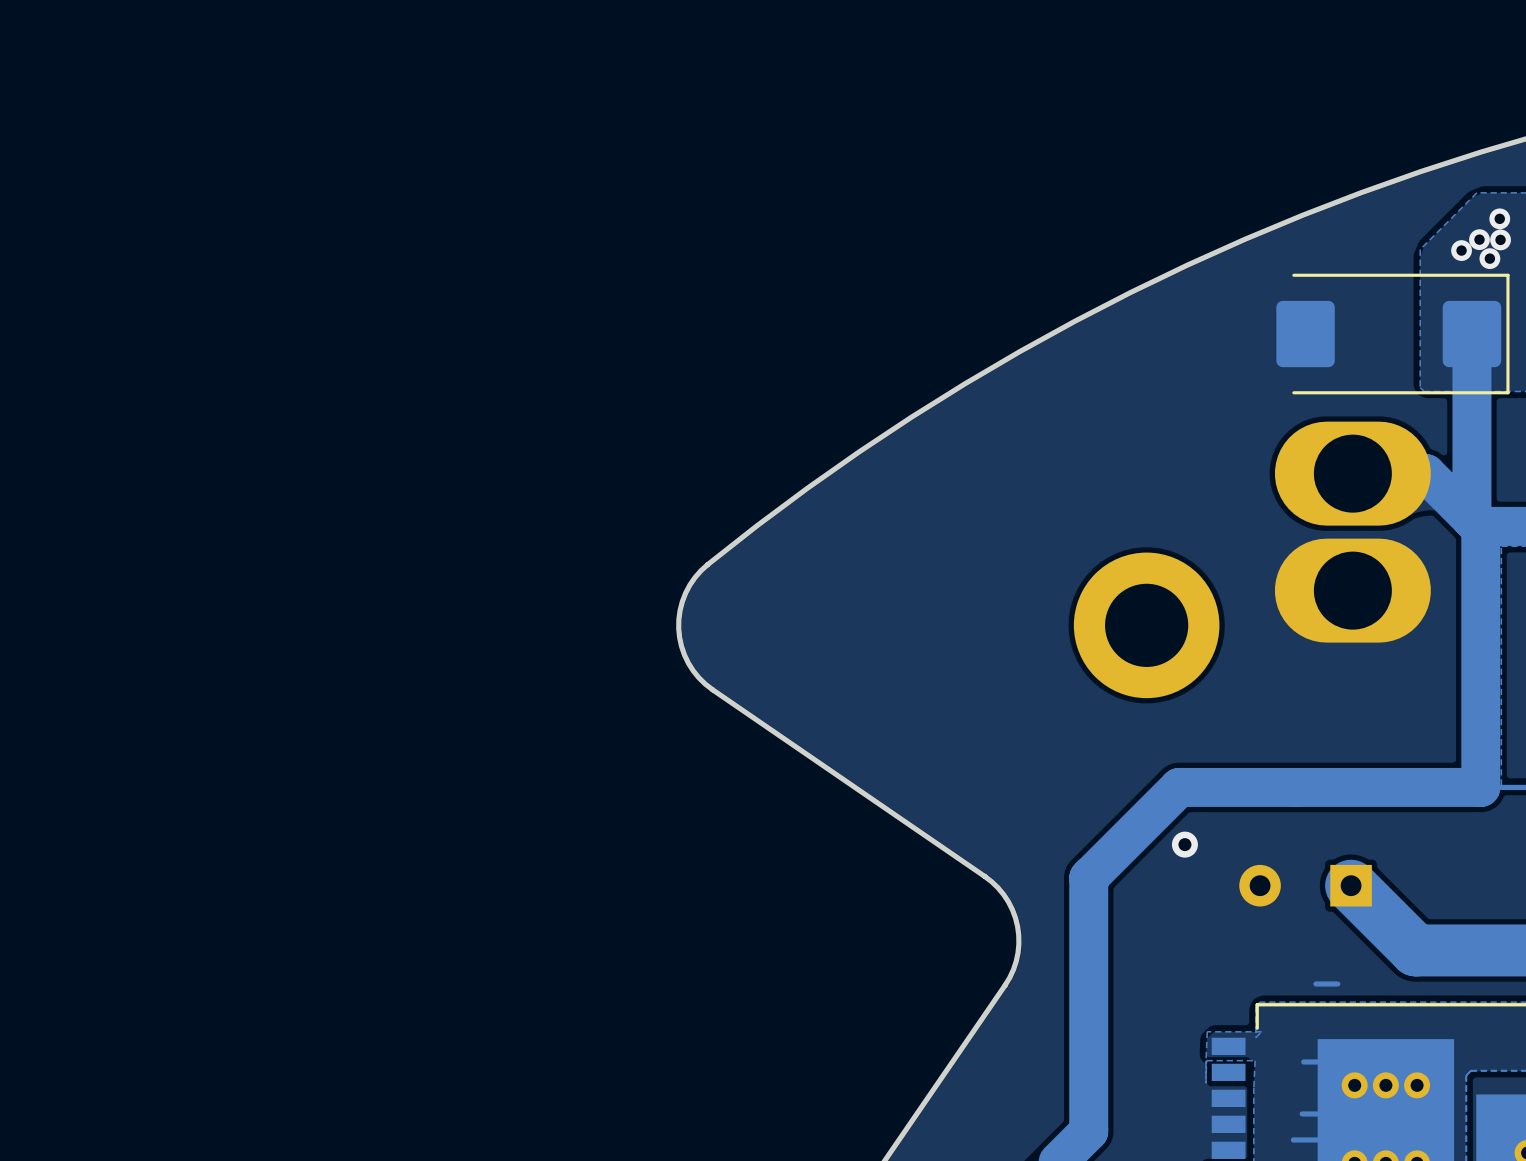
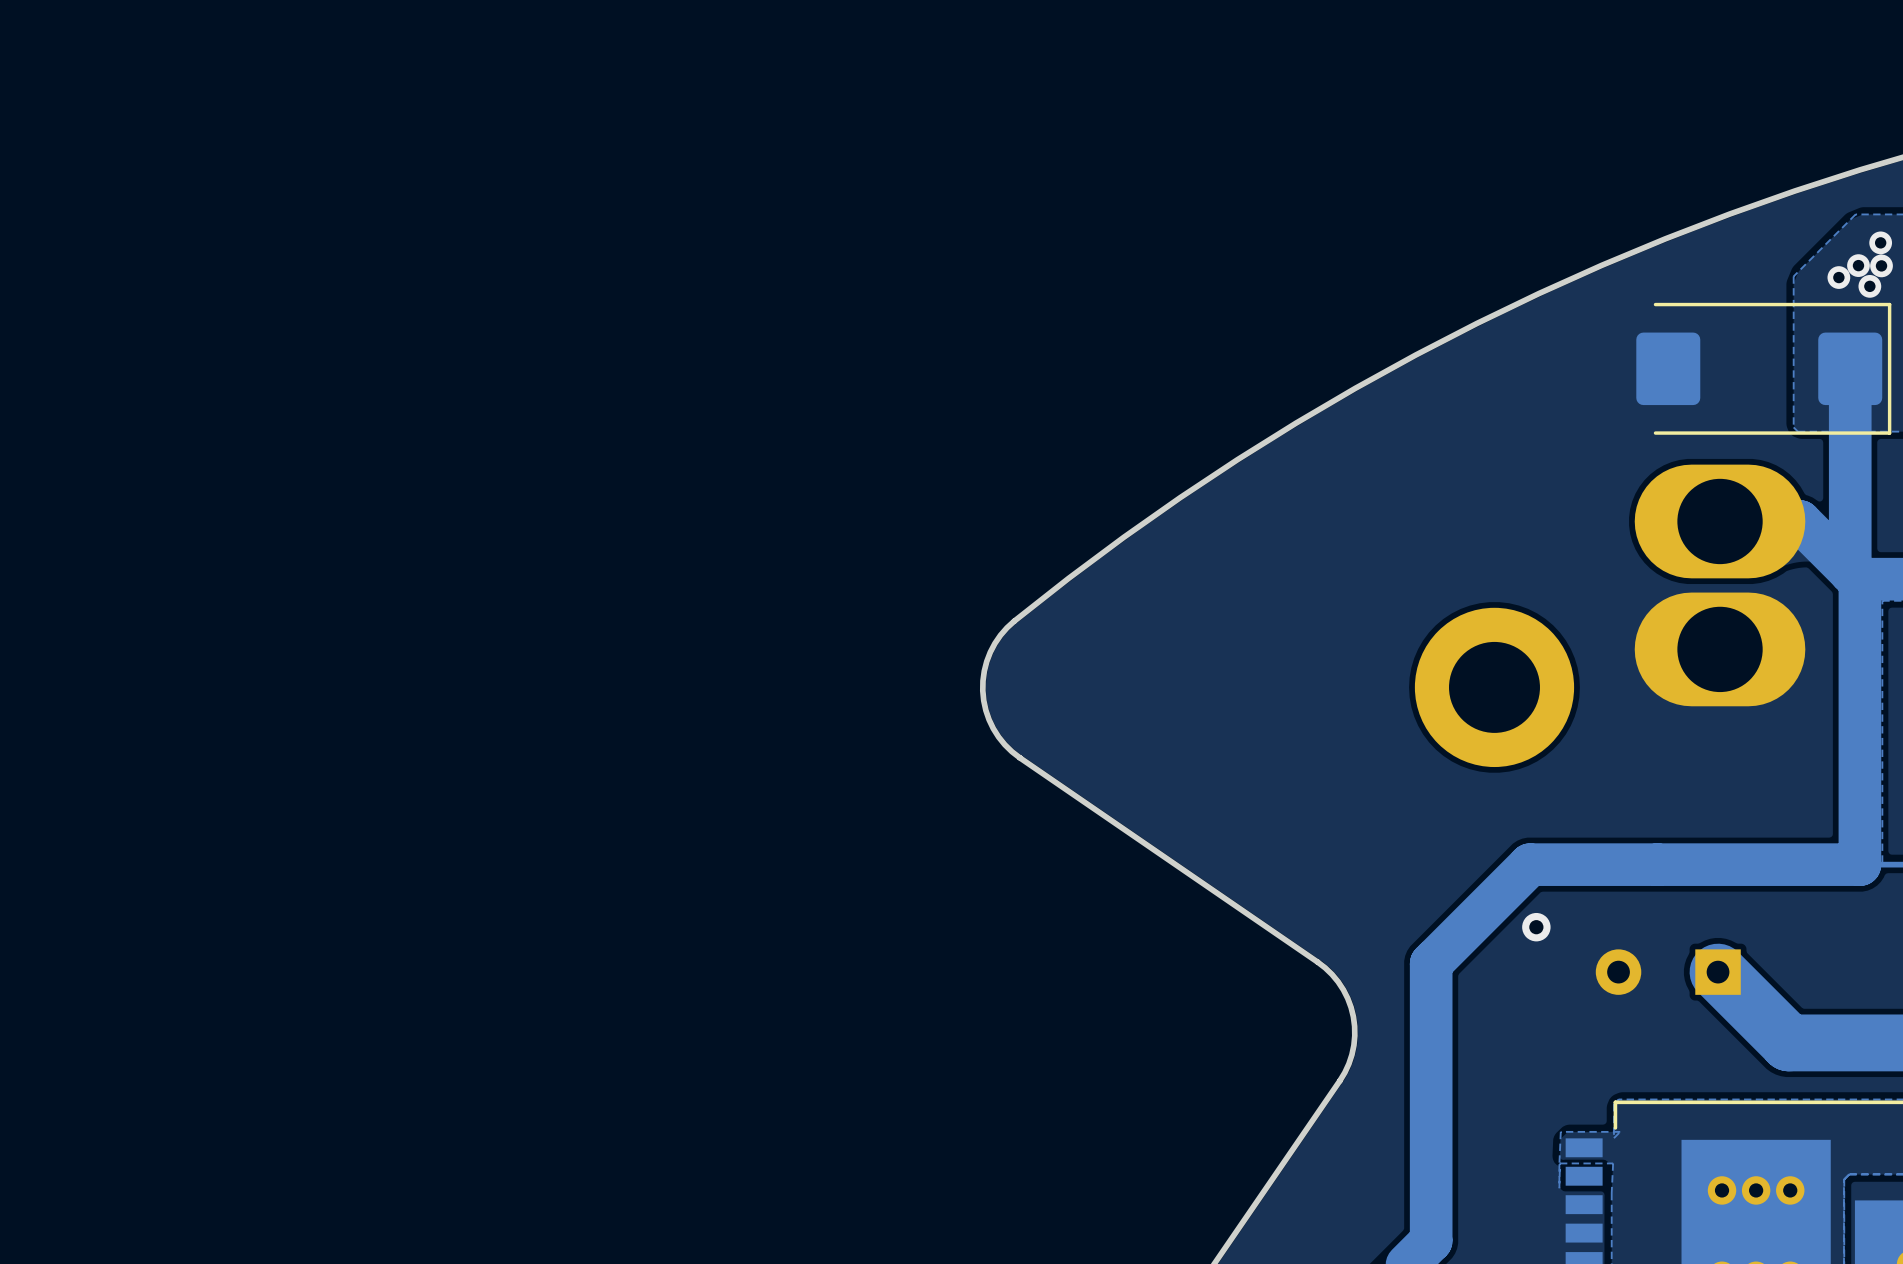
track: (1337, 983) (1315, 983) -> none
track: (1337, 1061) (1303, 1061) -> none
track: (1337, 1113) (1302, 1113) -> none
track: (1337, 1139) (1293, 1139) -> none

